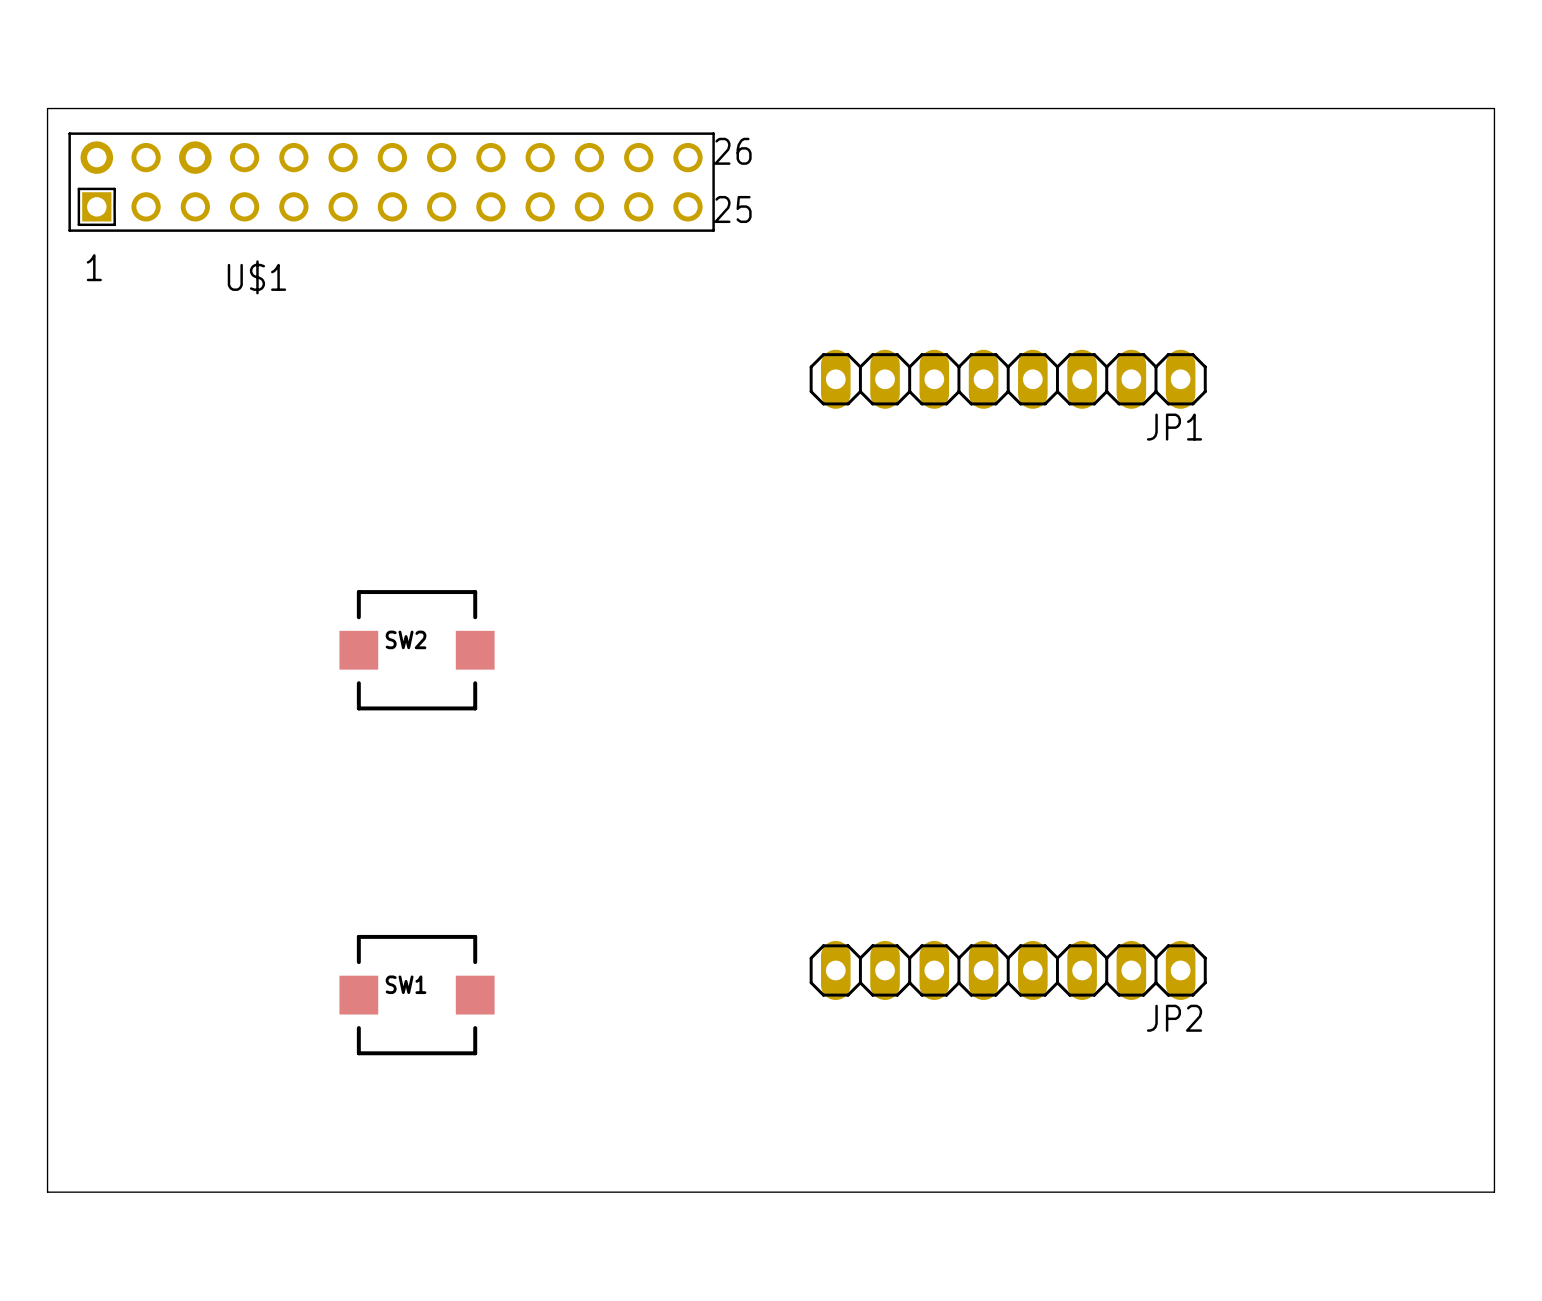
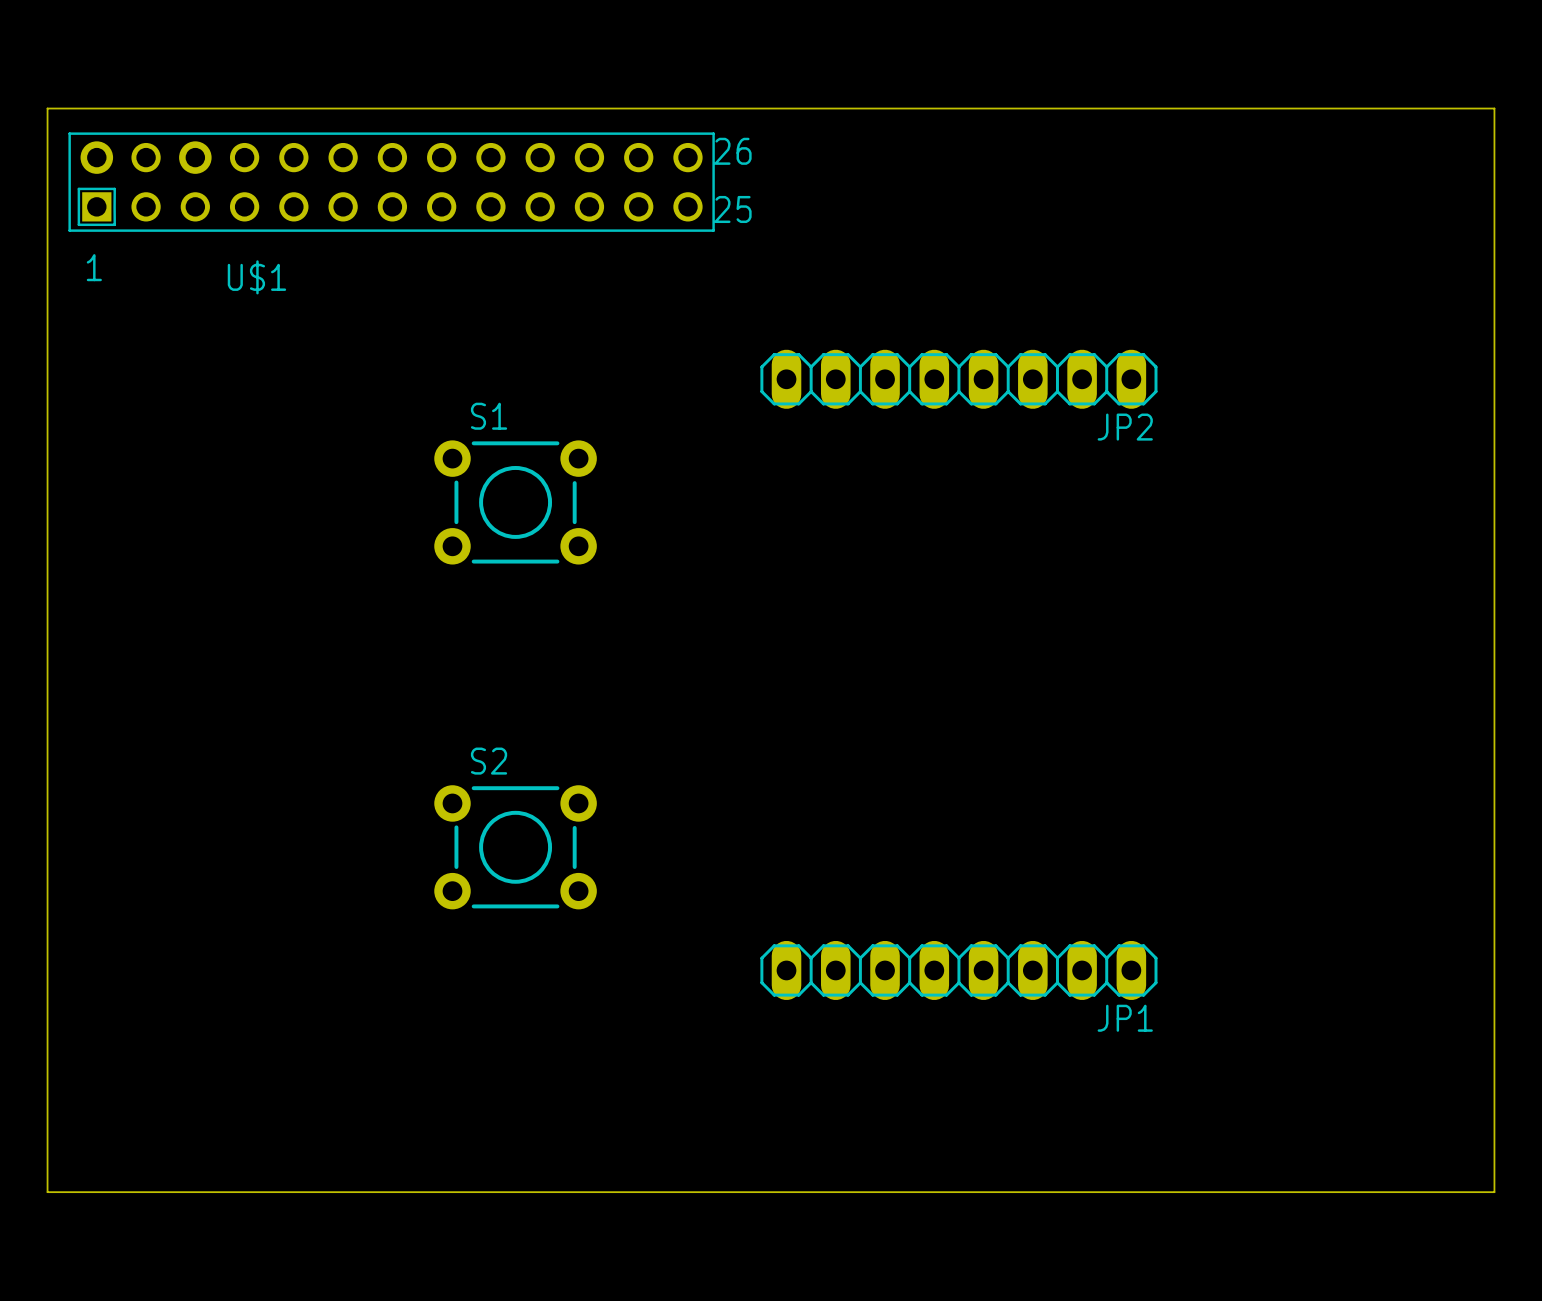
JP1 position: (1008, 379) -> (958, 970)
S1: none -> (515, 502)
SW2: (417, 650) -> none
S2: none -> (515, 847)
JP2 position: (1008, 970) -> (958, 379)
SW1: (417, 995) -> none

